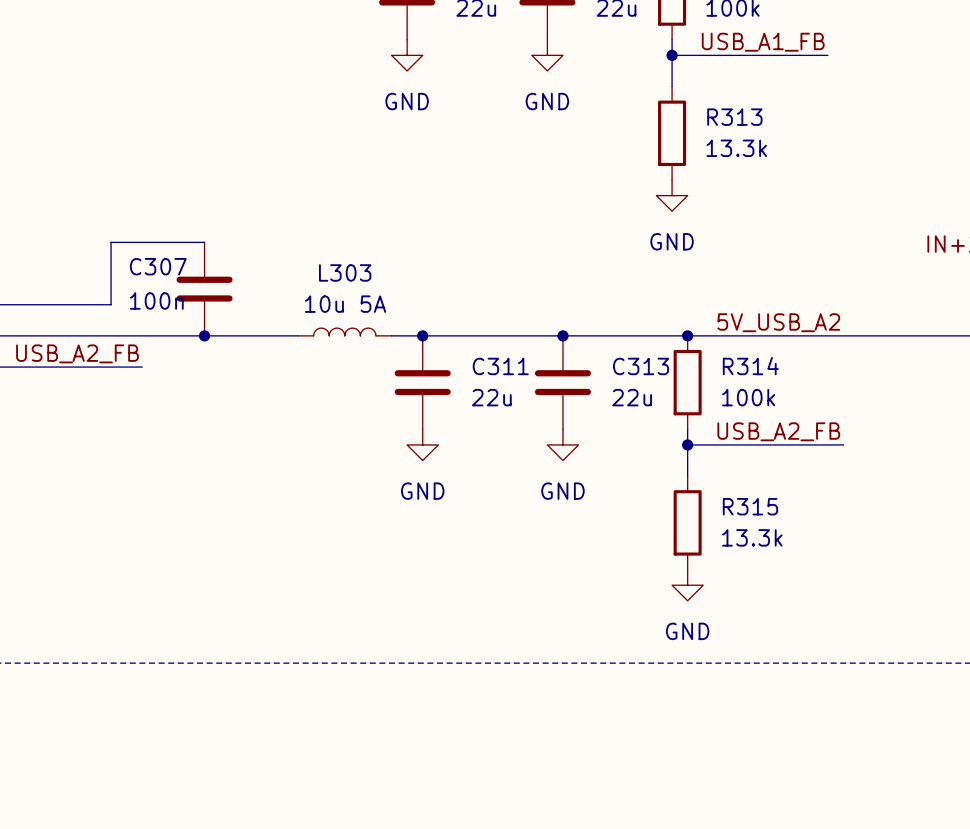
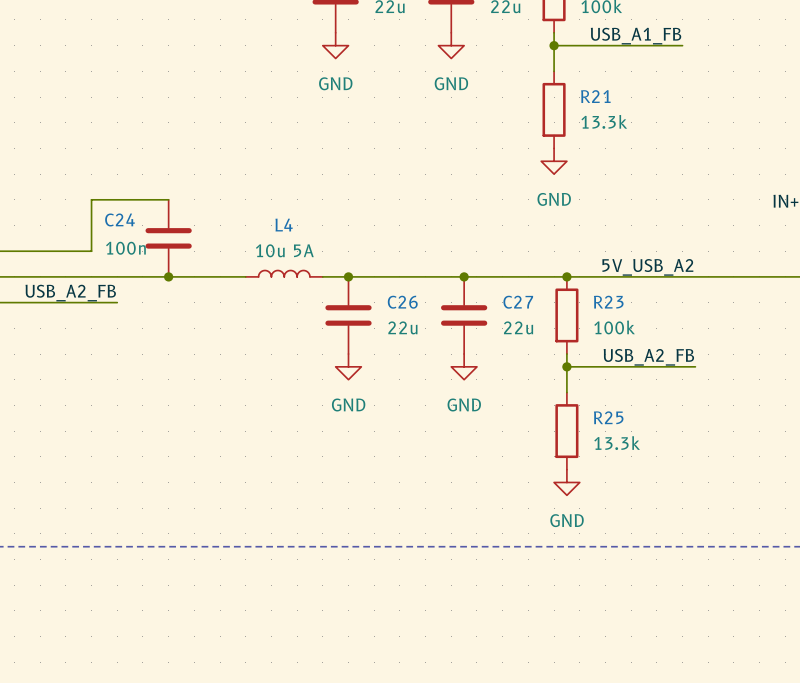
R313 name: R313 (734, 117) -> R21 (595, 96)
C307 name: C307 (158, 266) -> C24 (119, 219)
L303 name: L303 (345, 272) -> L4 (284, 225)
C311 name: C311 (500, 366) -> C26 (402, 302)
C313 name: C313 (641, 366) -> C27 (518, 302)
R314 name: R314 (750, 366) -> R23 (608, 302)
R315 name: R315 (750, 506) -> R25 (608, 417)

